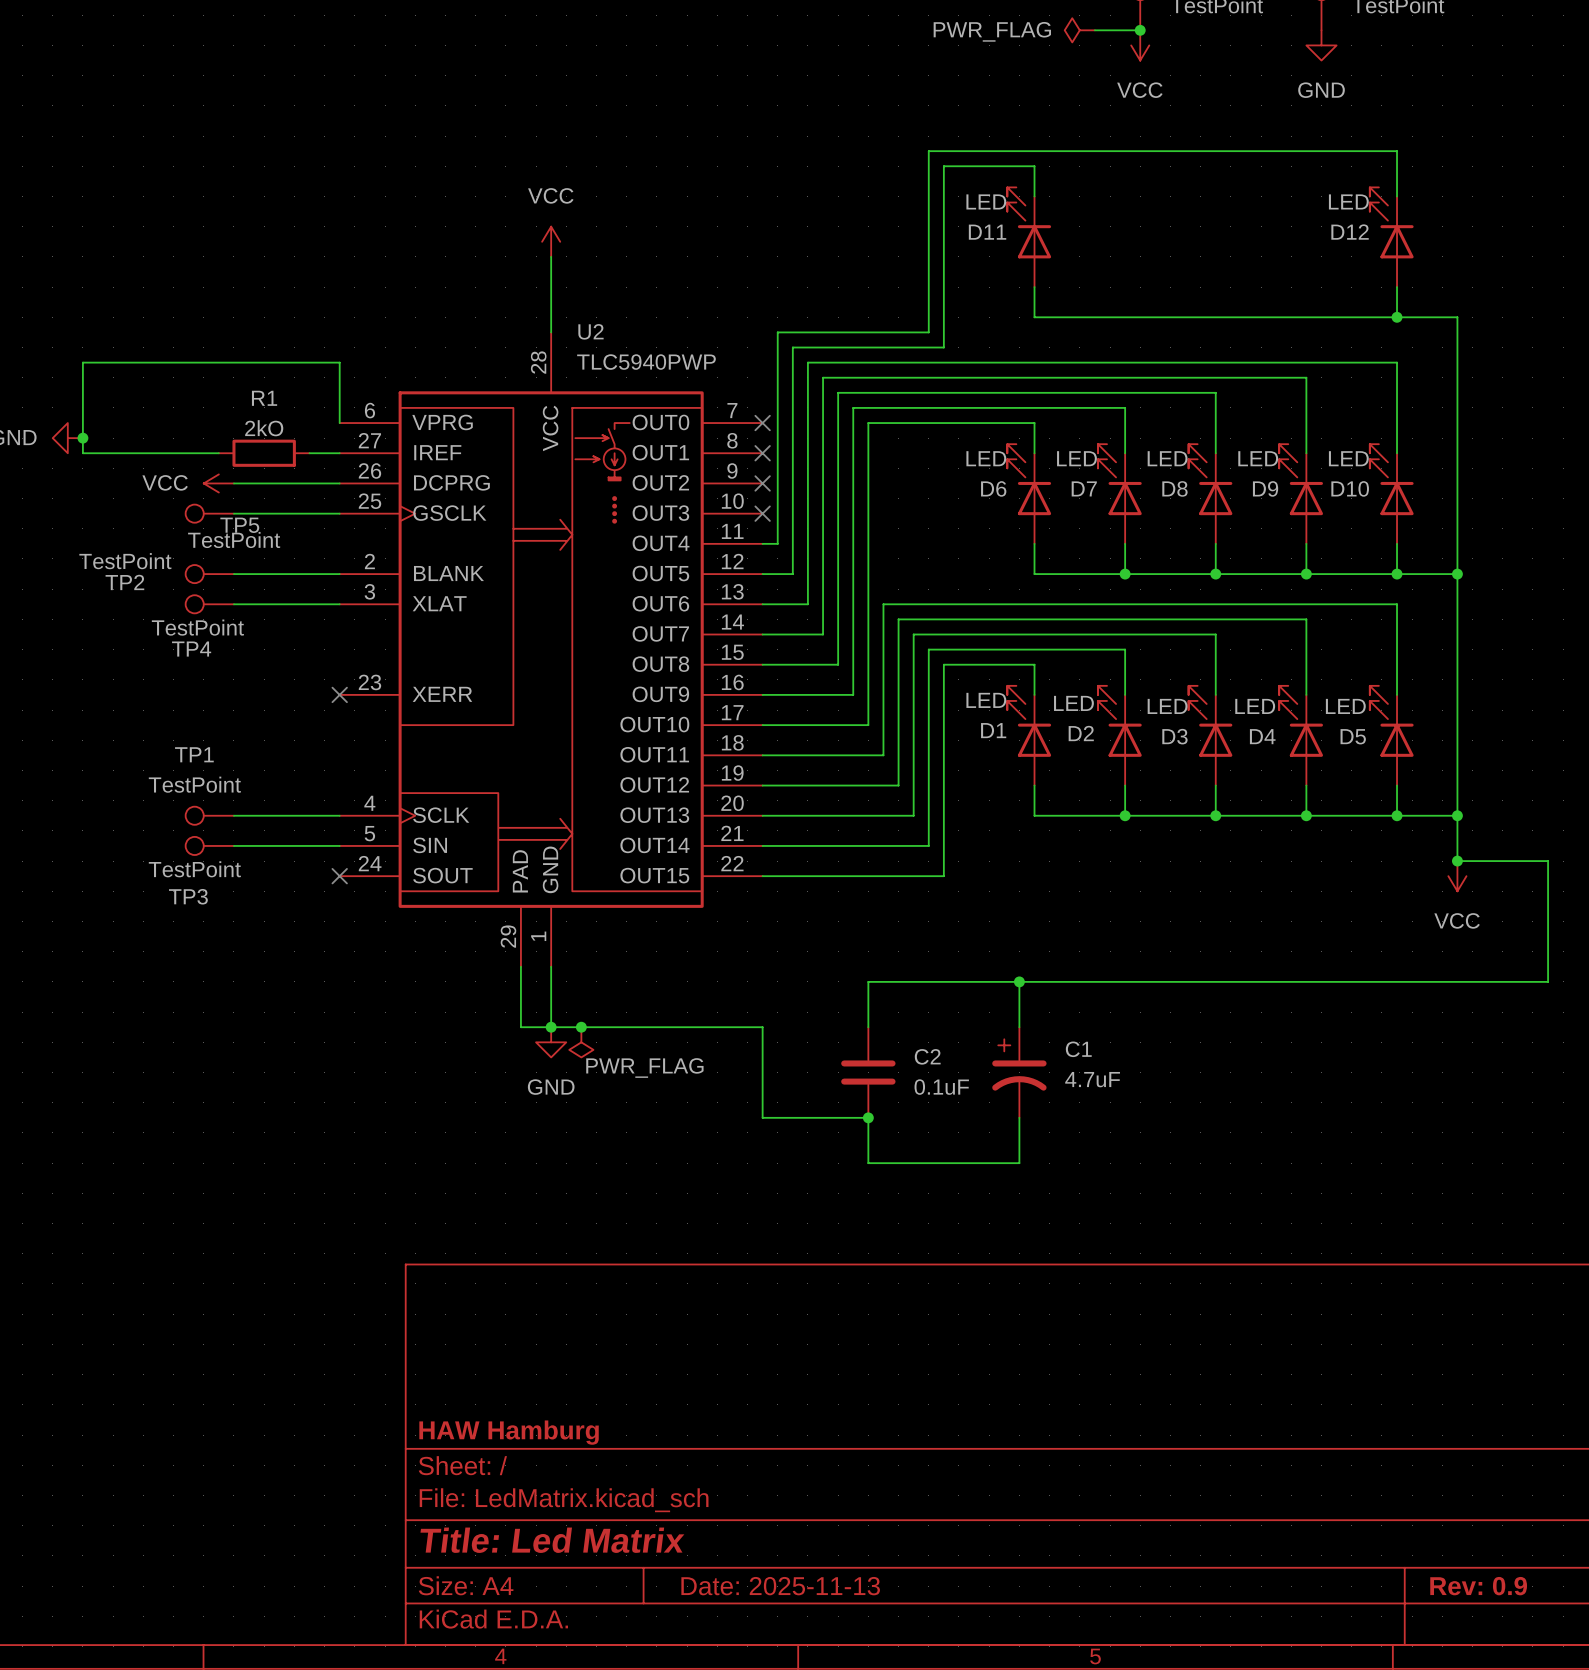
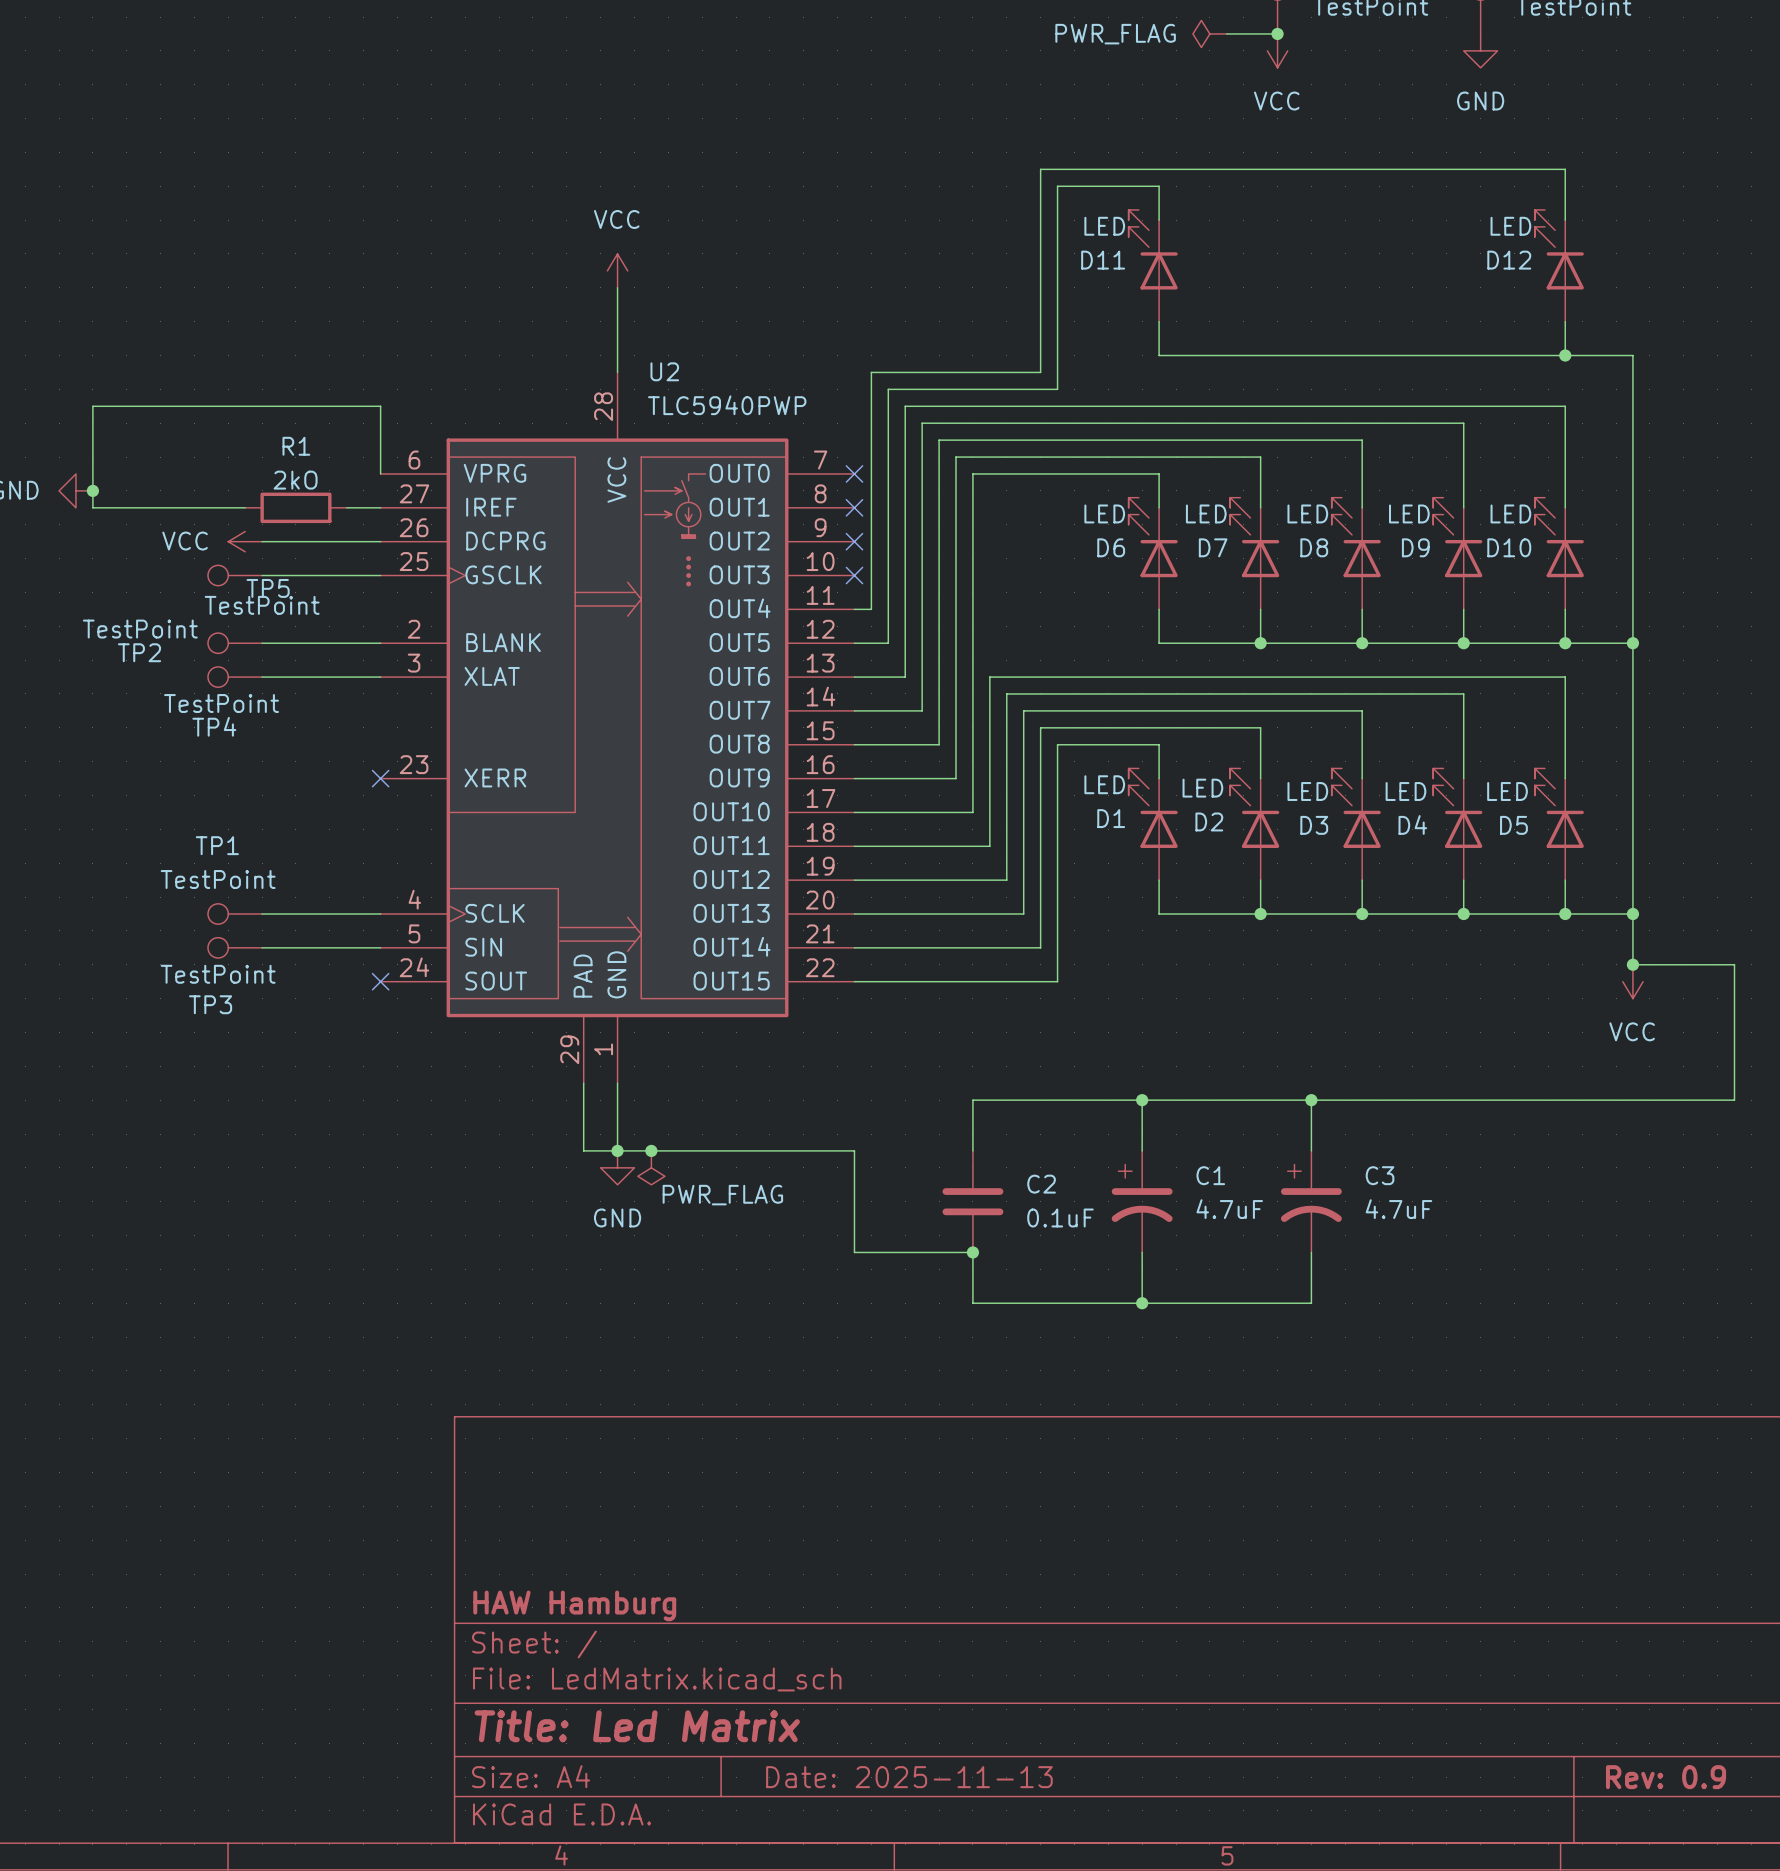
wire: none -> (1311, 1100) (1311, 1150)
junction: none -> (1311, 1100)
C3: none -> 4.7uF (1311, 1201)
wire: none -> (1311, 1252) (1311, 1303) (1142, 1303)
junction: none -> (1142, 1303)

